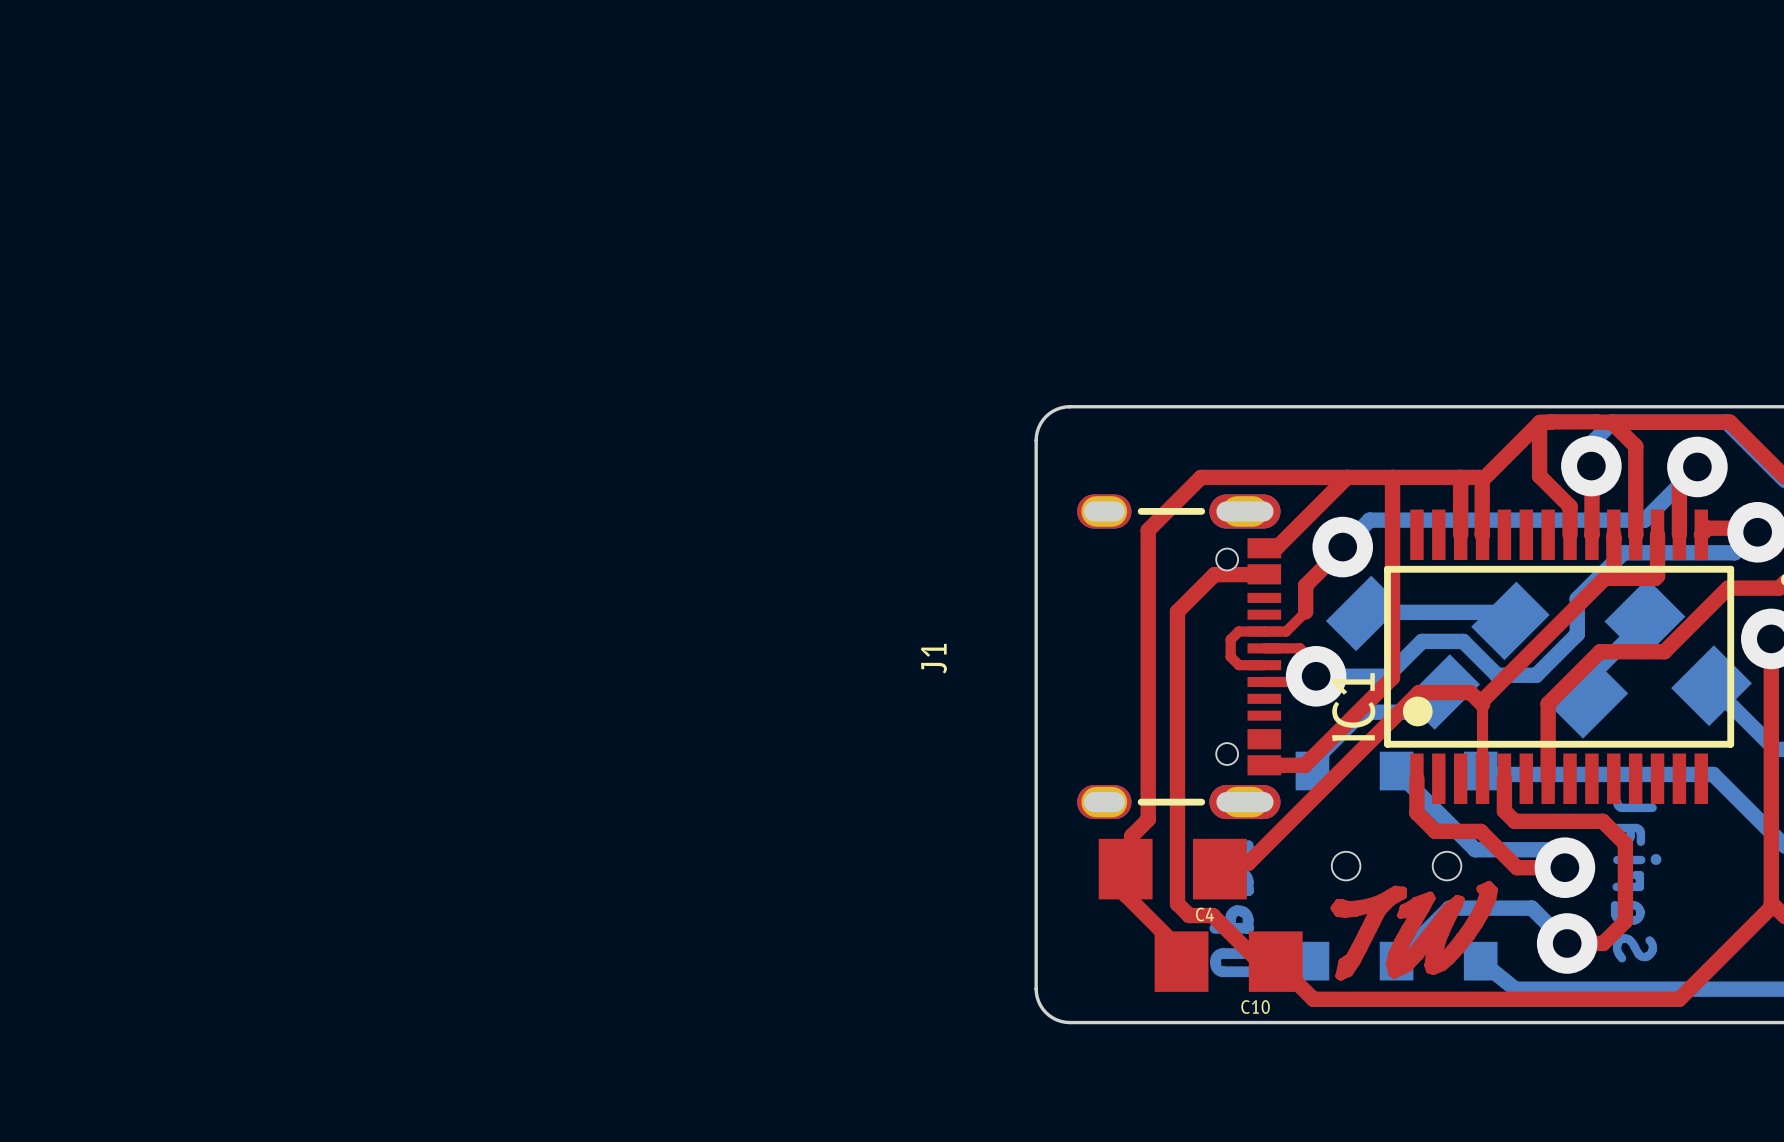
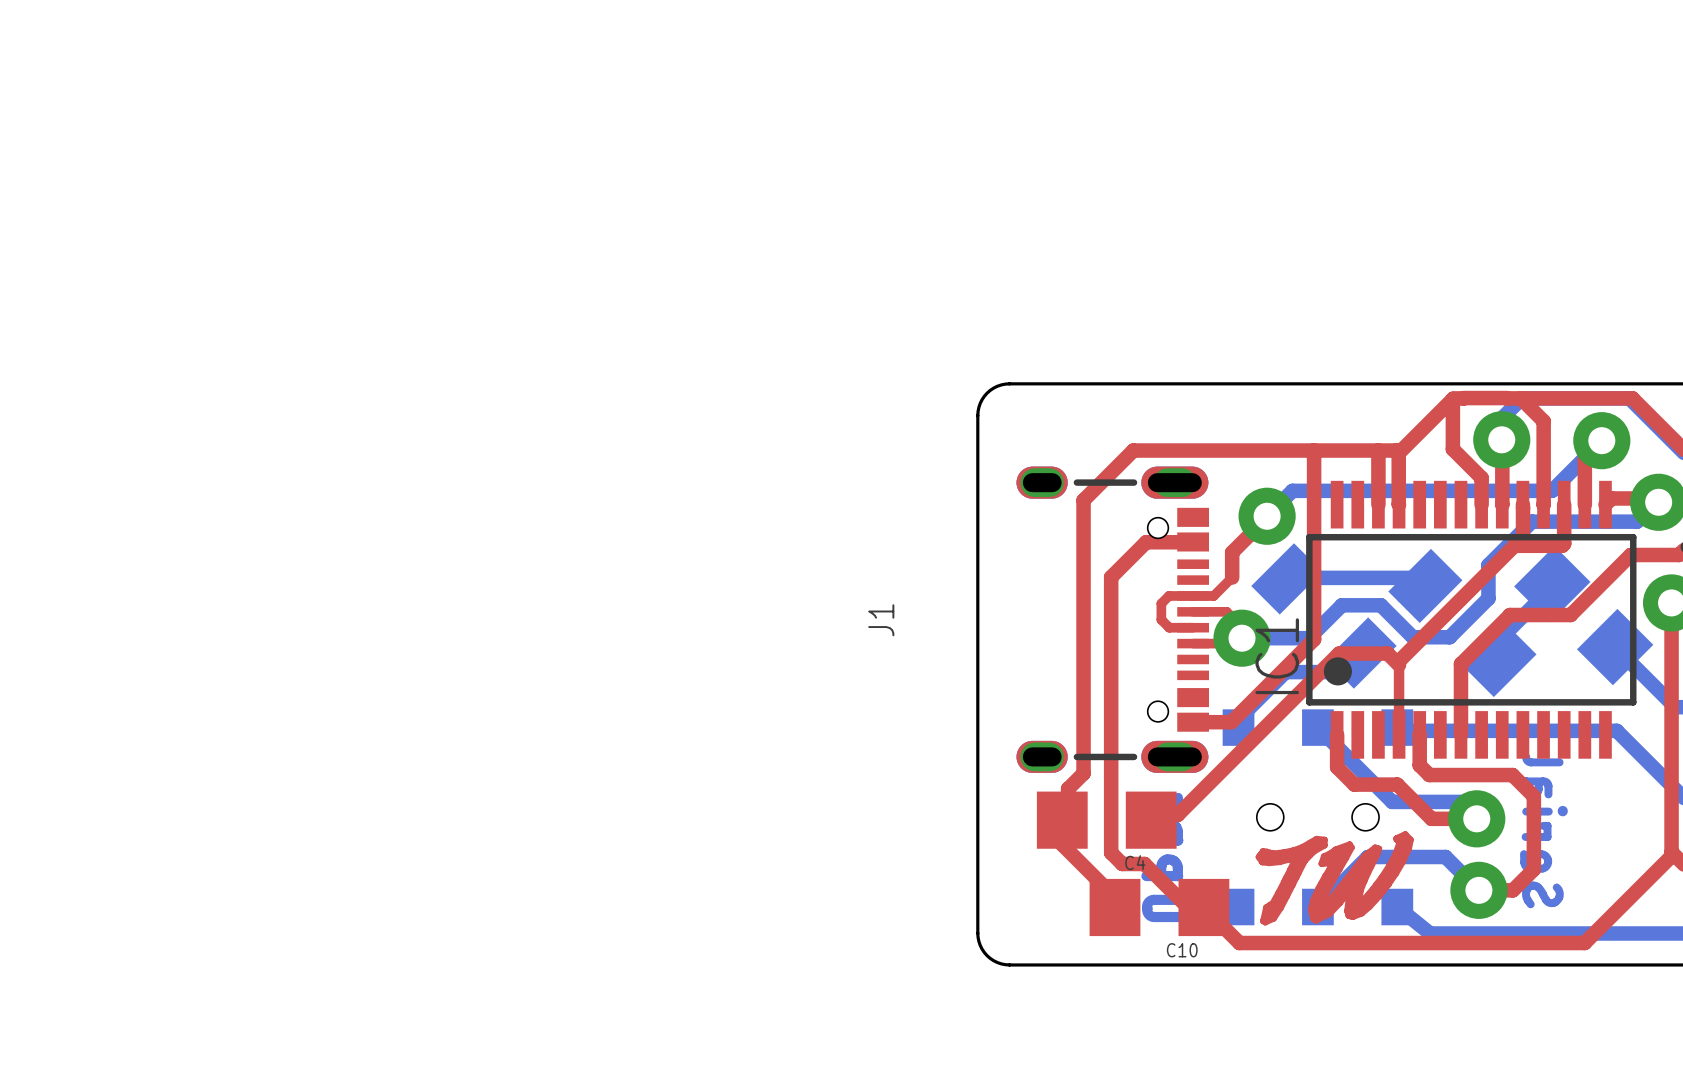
top track: (1347, 477) (1276, 548) (1265, 548) -> none

